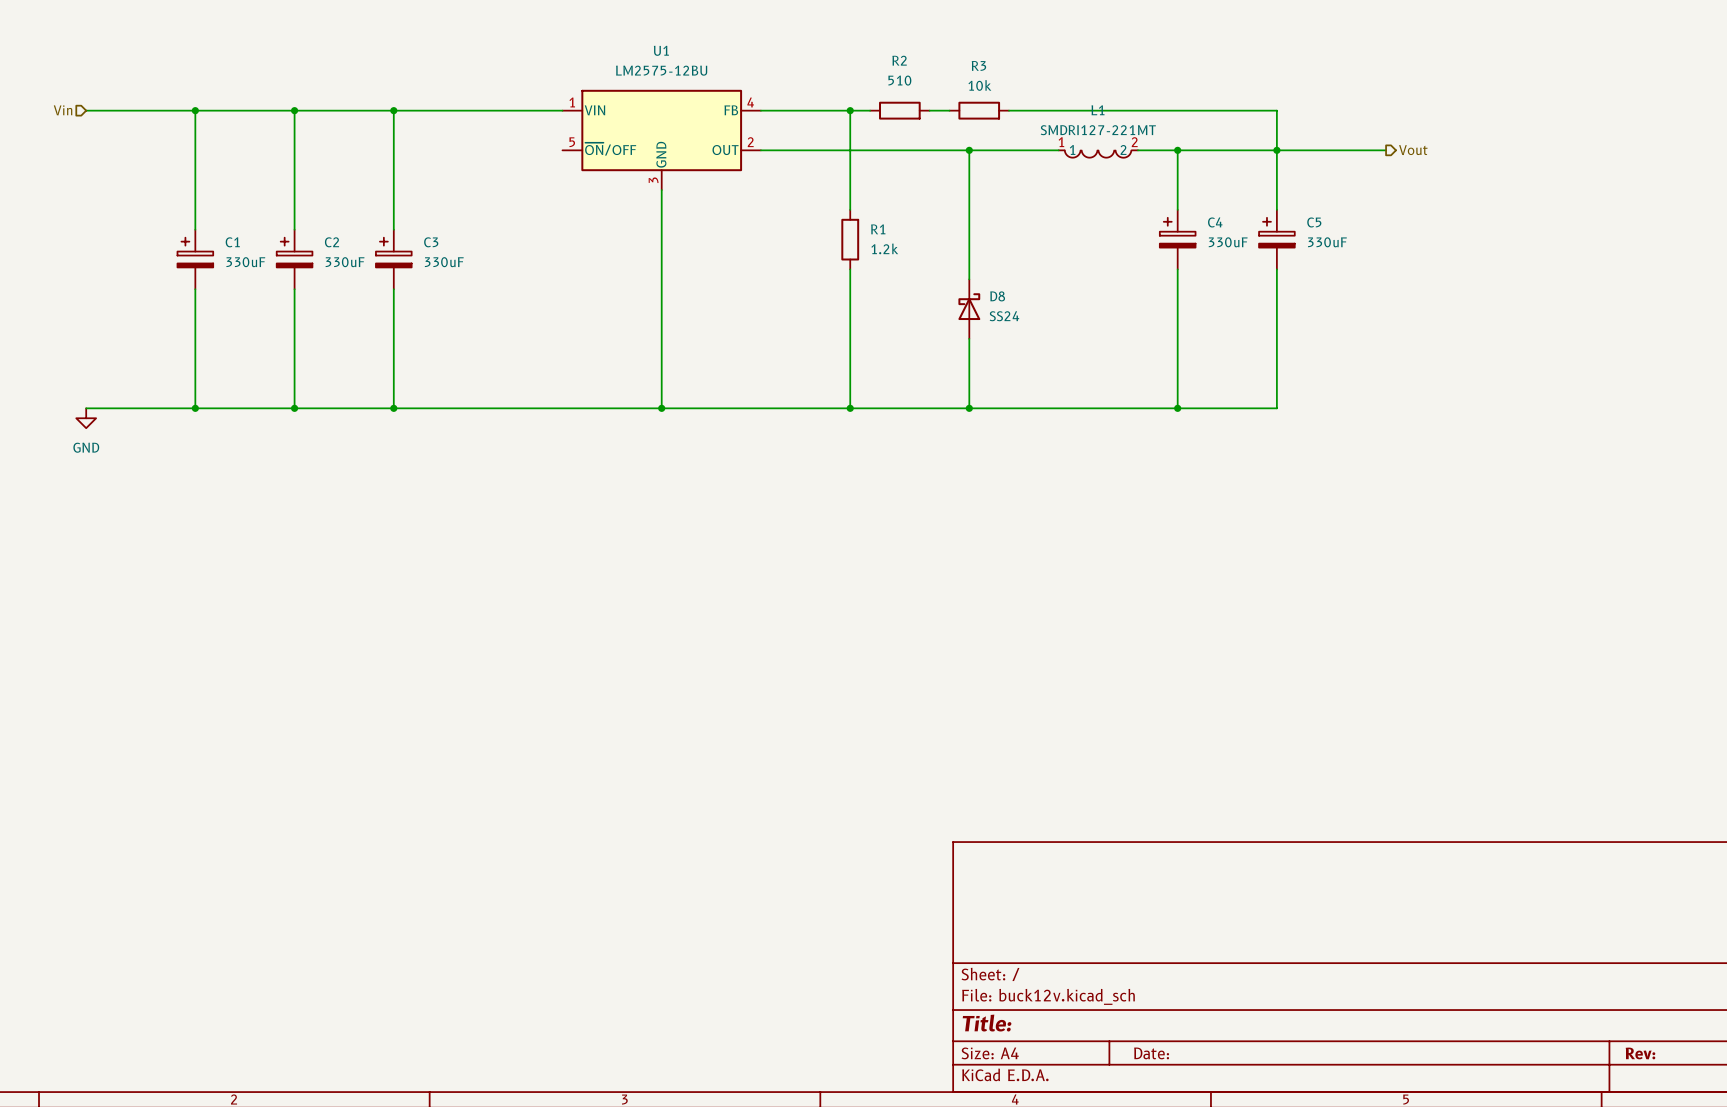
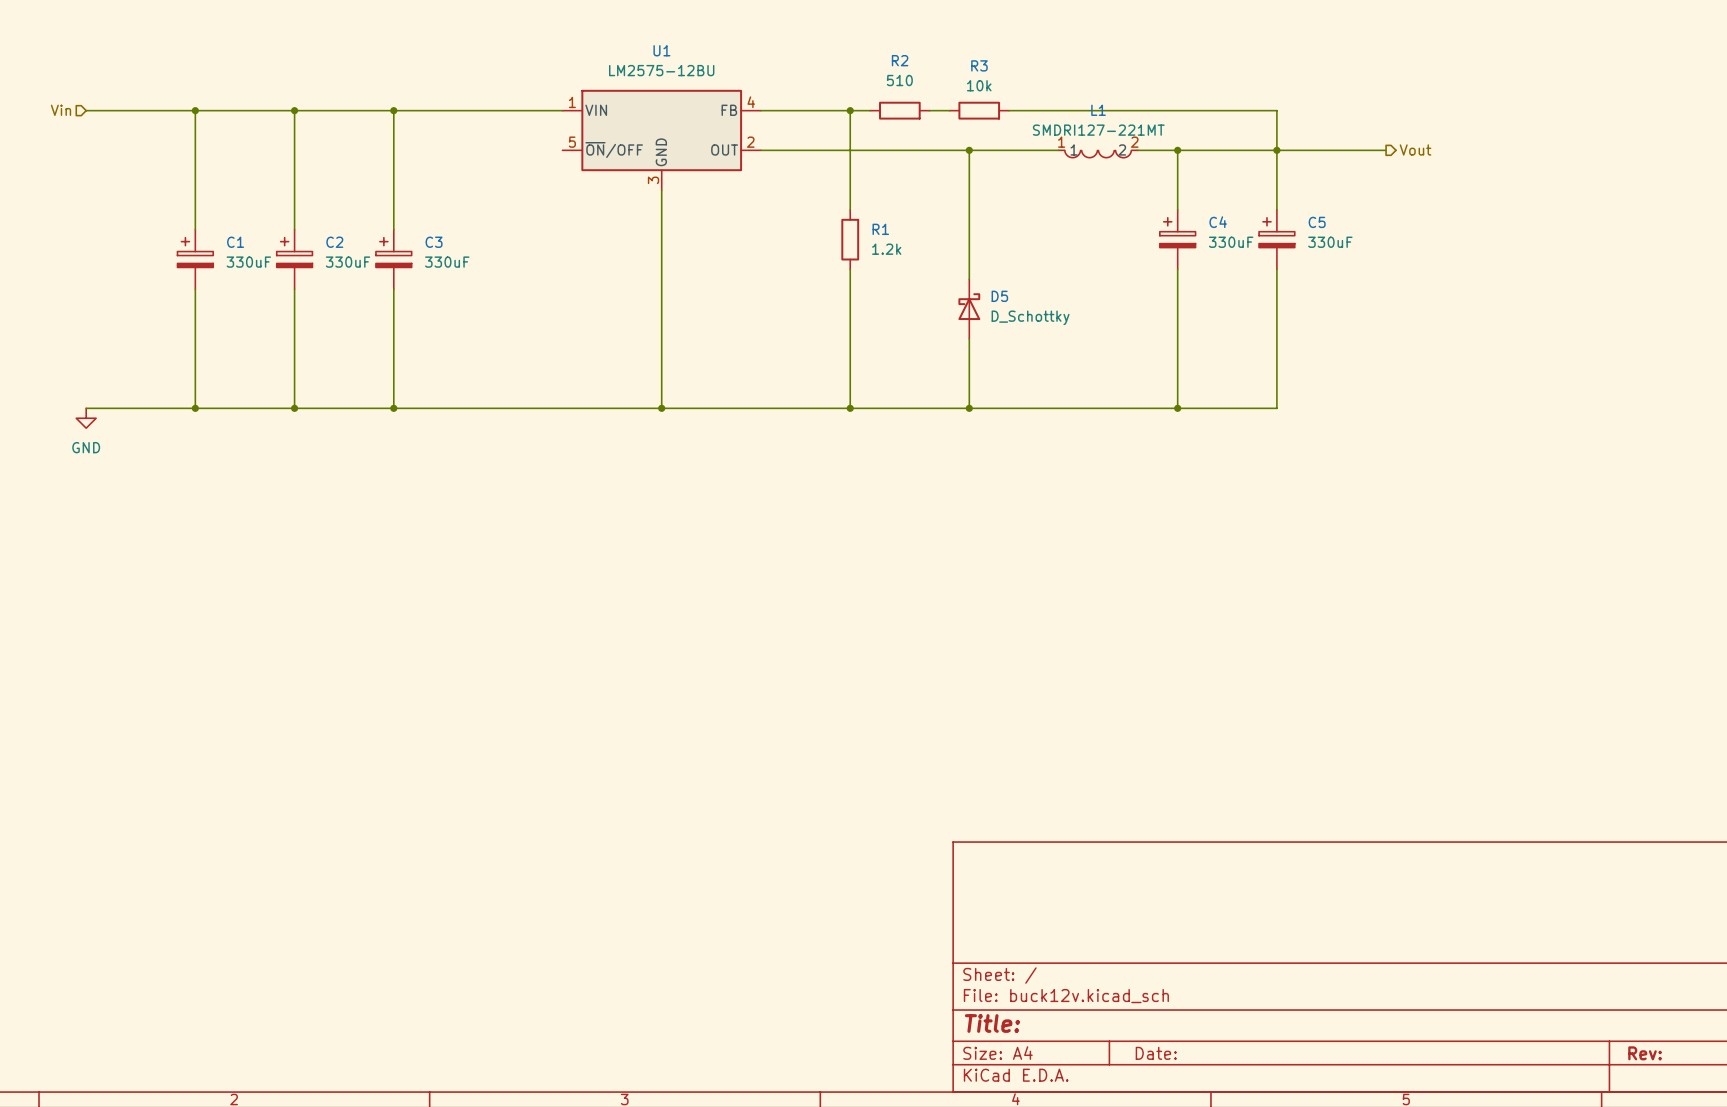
D8 name: D8 (997, 296) -> D5 (999, 296)
D8 value: SS24 (1004, 316) -> D_Schottky (1030, 317)

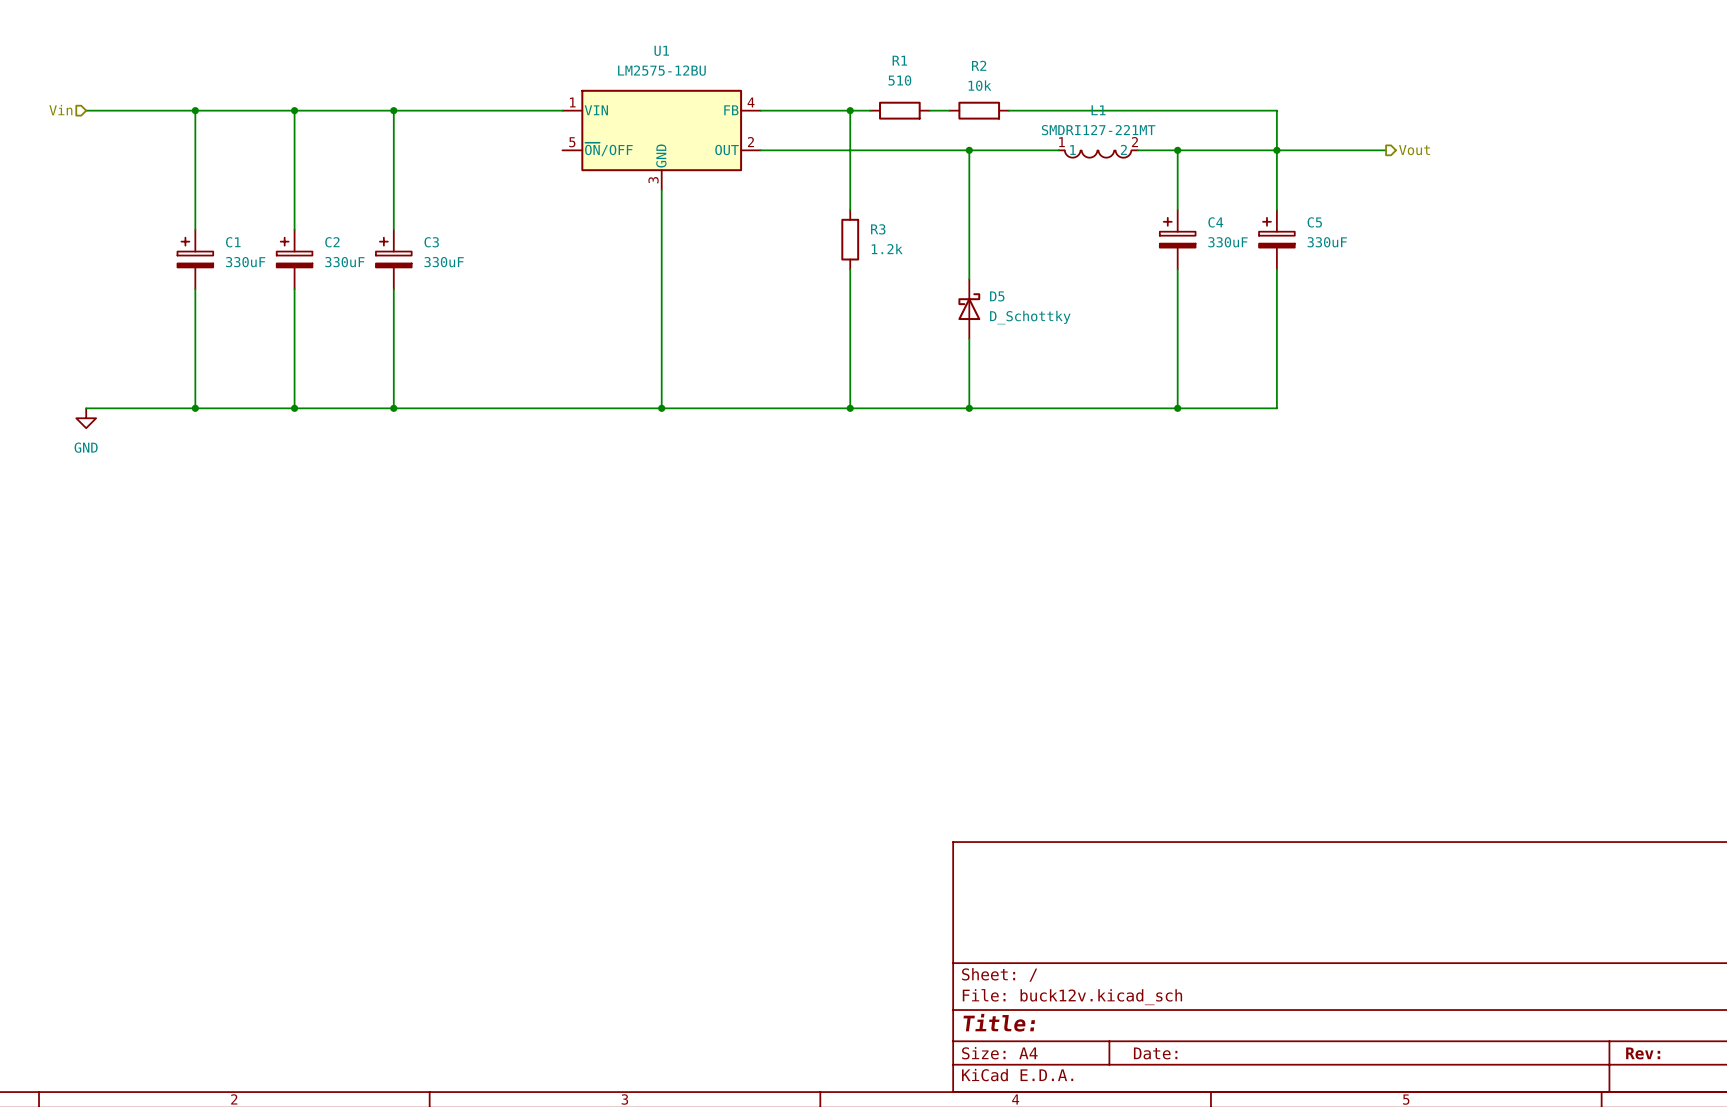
R2 name: R2 (900, 60) -> R1 (899, 60)
R3 name: R3 (979, 65) -> R2 (979, 65)
R1 name: R1 (880, 229) -> R3 (878, 229)

